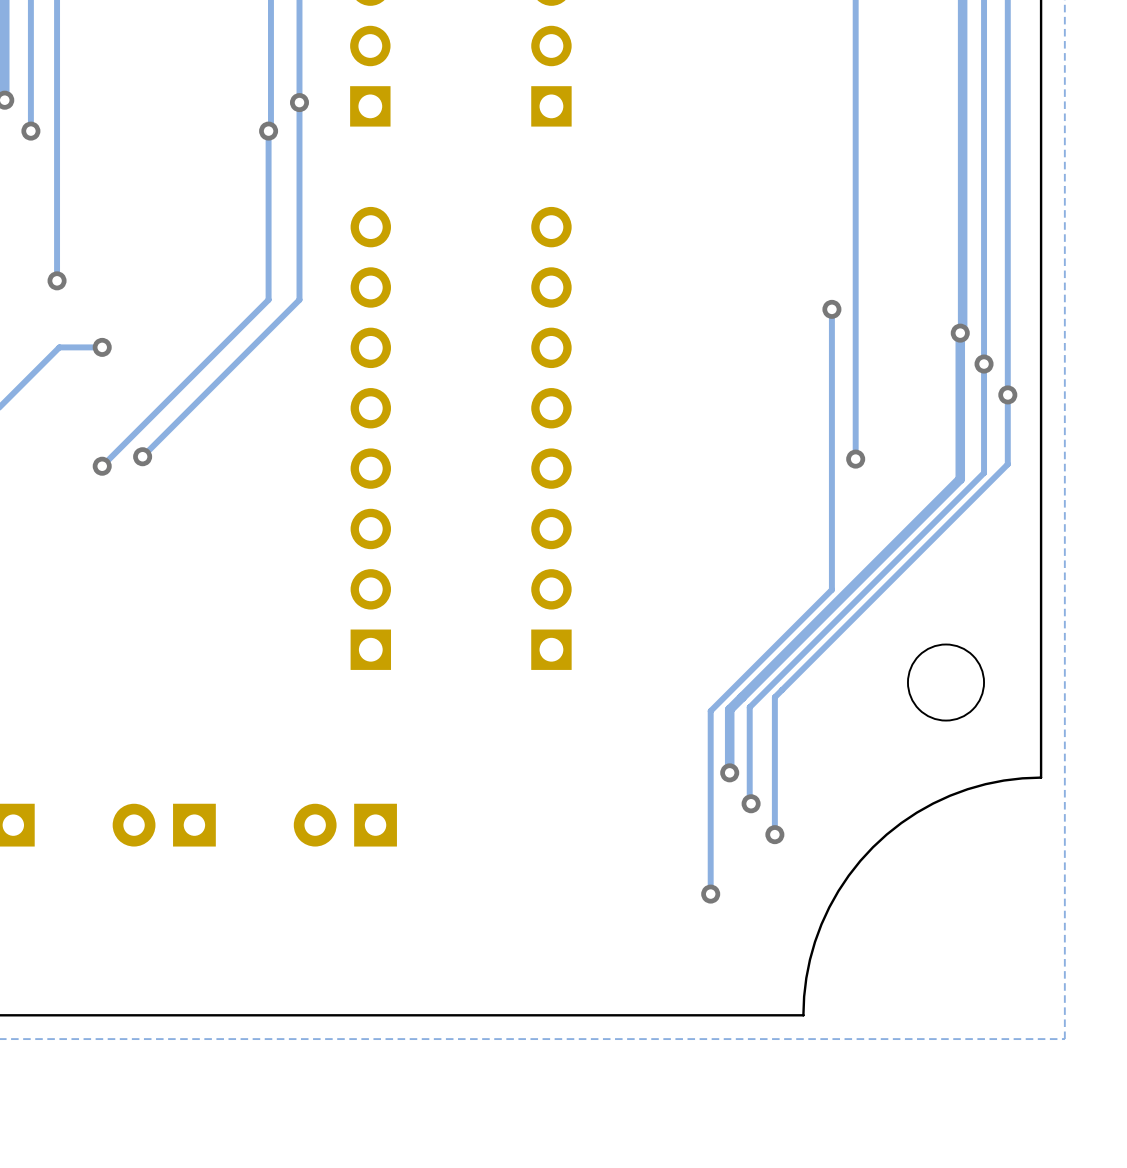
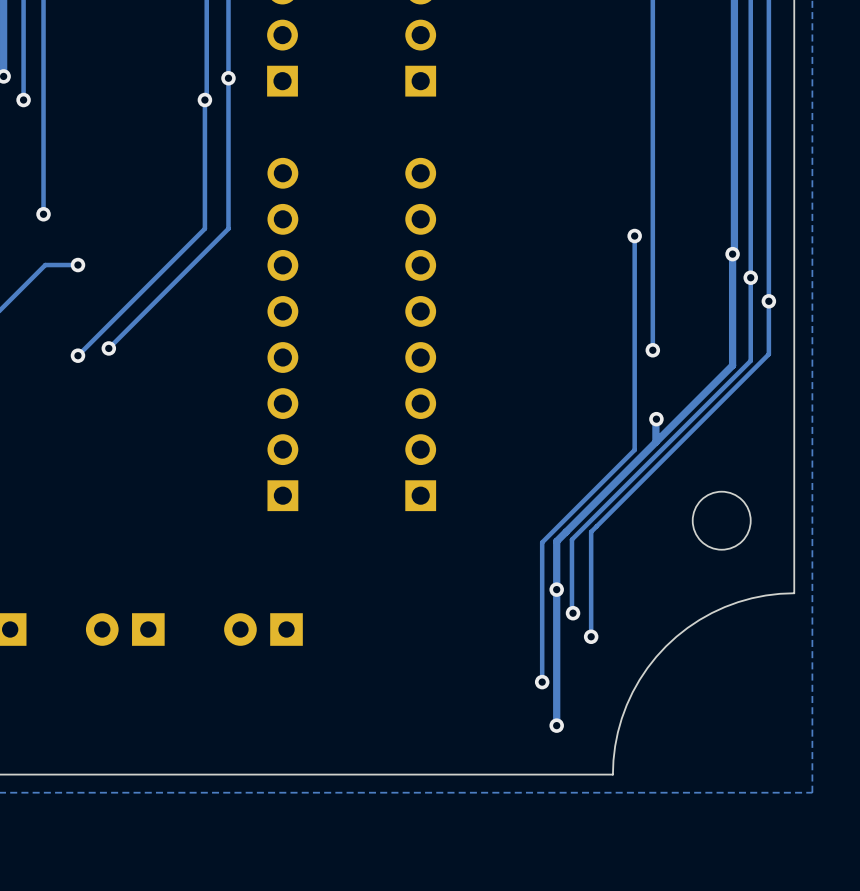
track: none -> (656, 419) (655, 442)
via: none -> (656, 419)
track: none -> (556, 589) (556, 725)
via: none -> (556, 725)

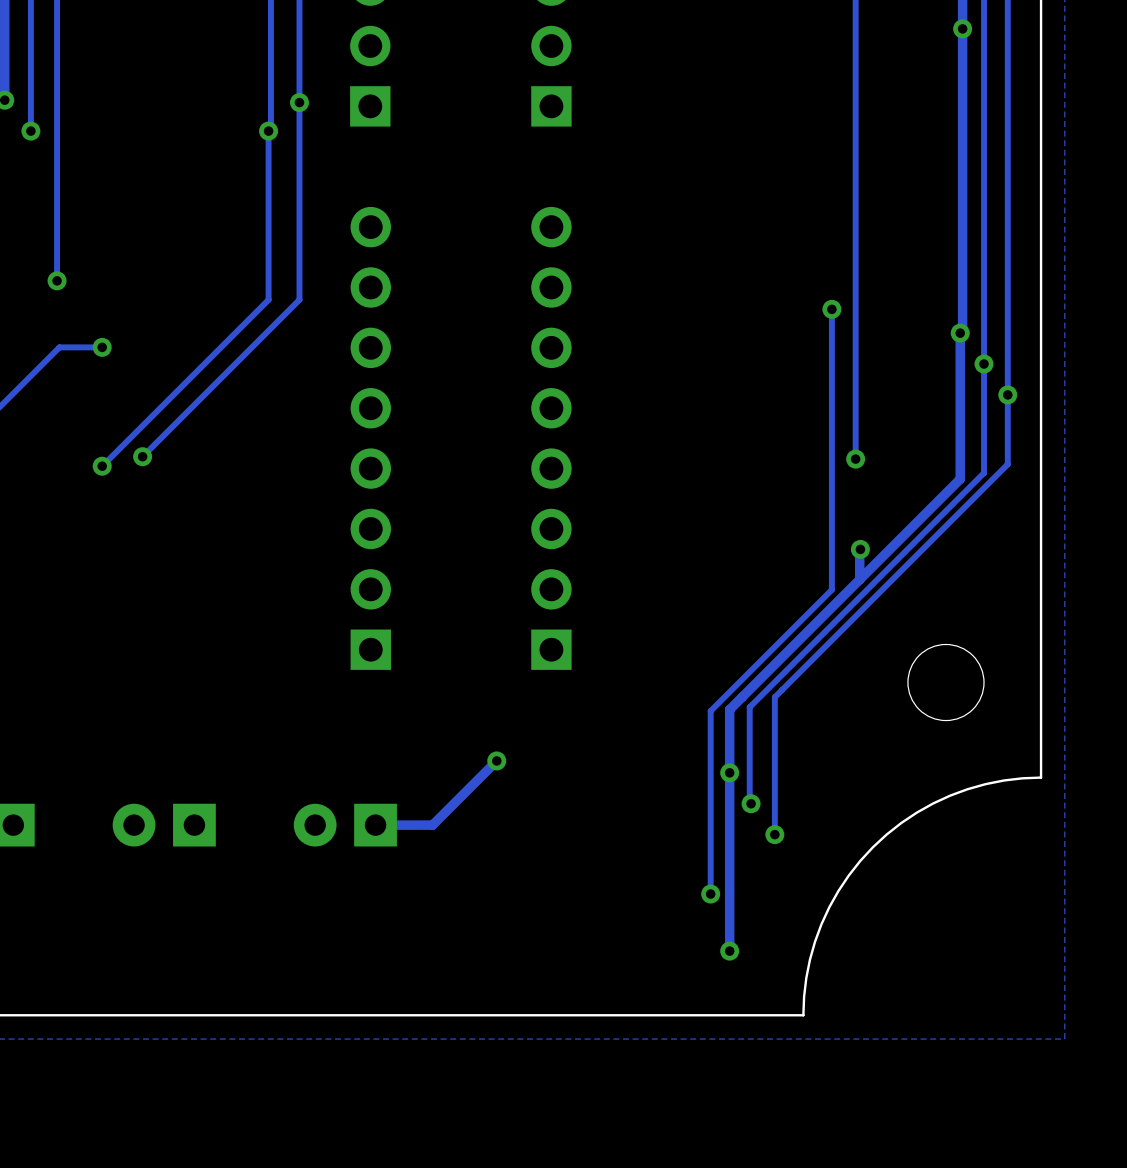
via: none -> (962, 28)
track: none -> (496, 760) (432, 825) (375, 825)
via: none -> (496, 760)

